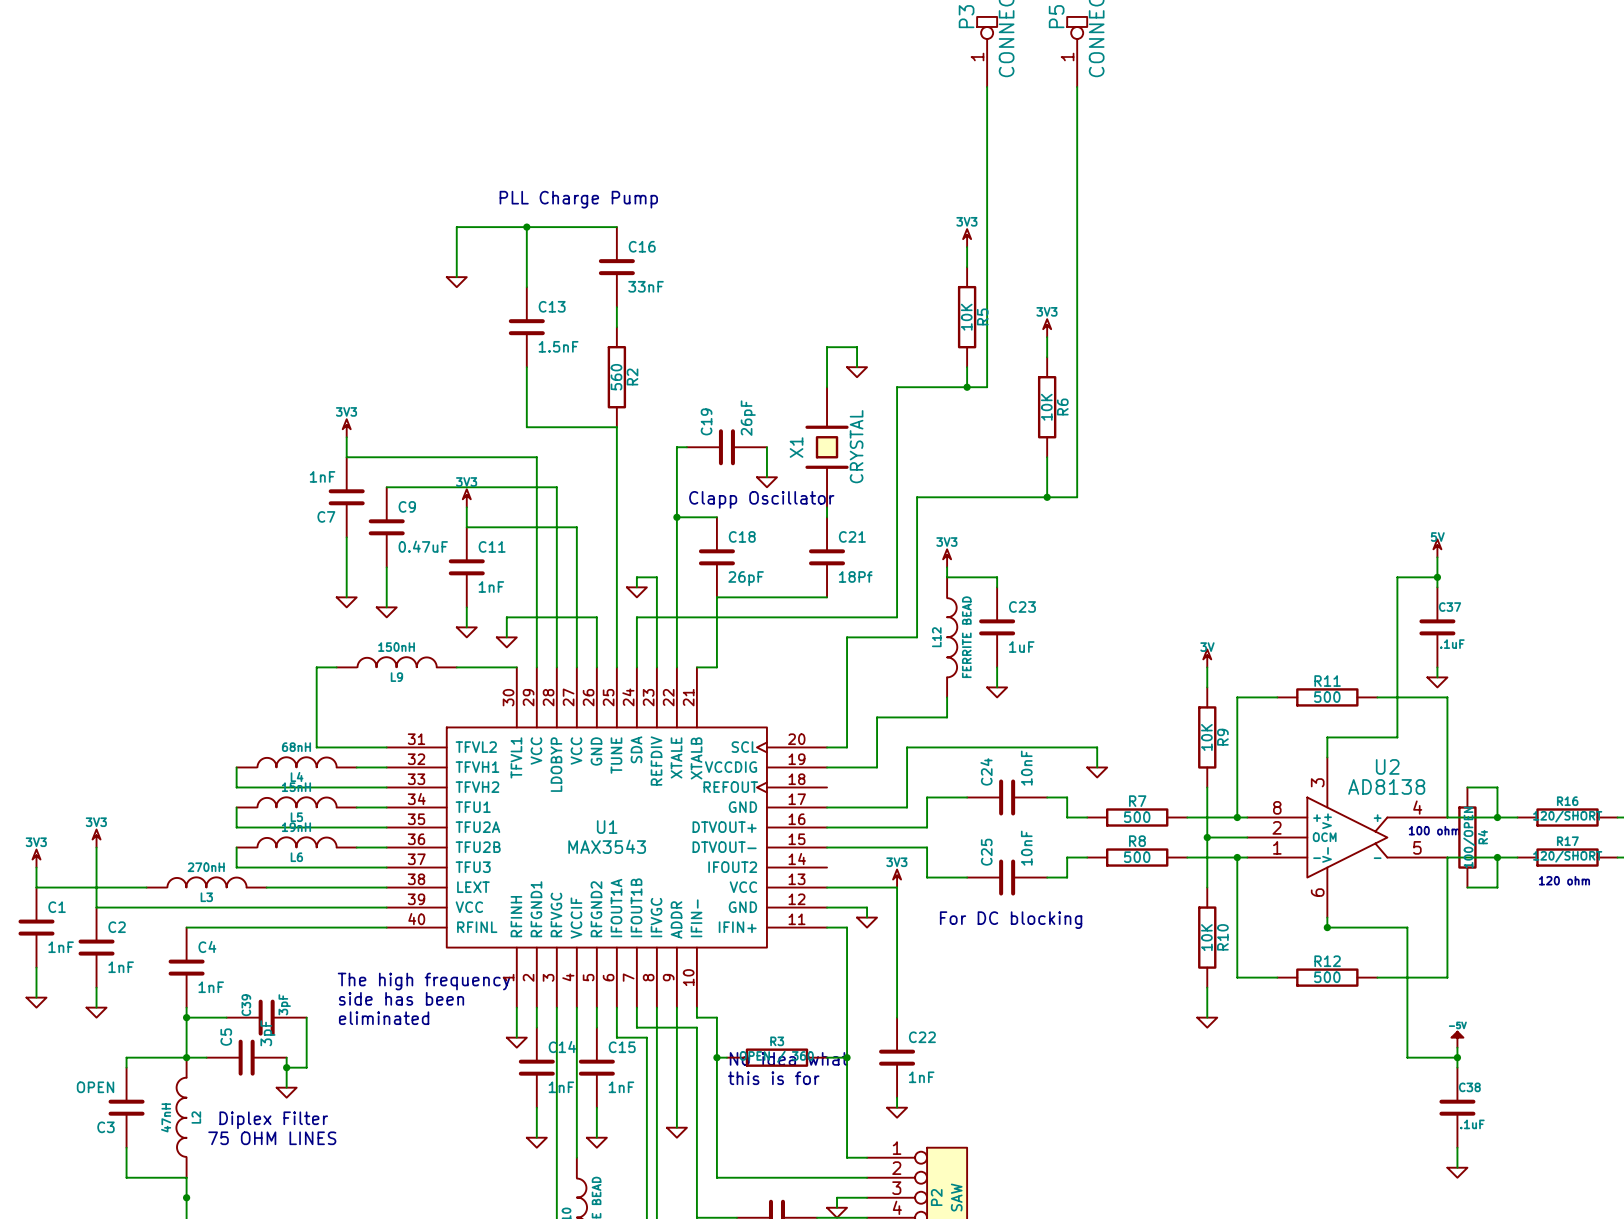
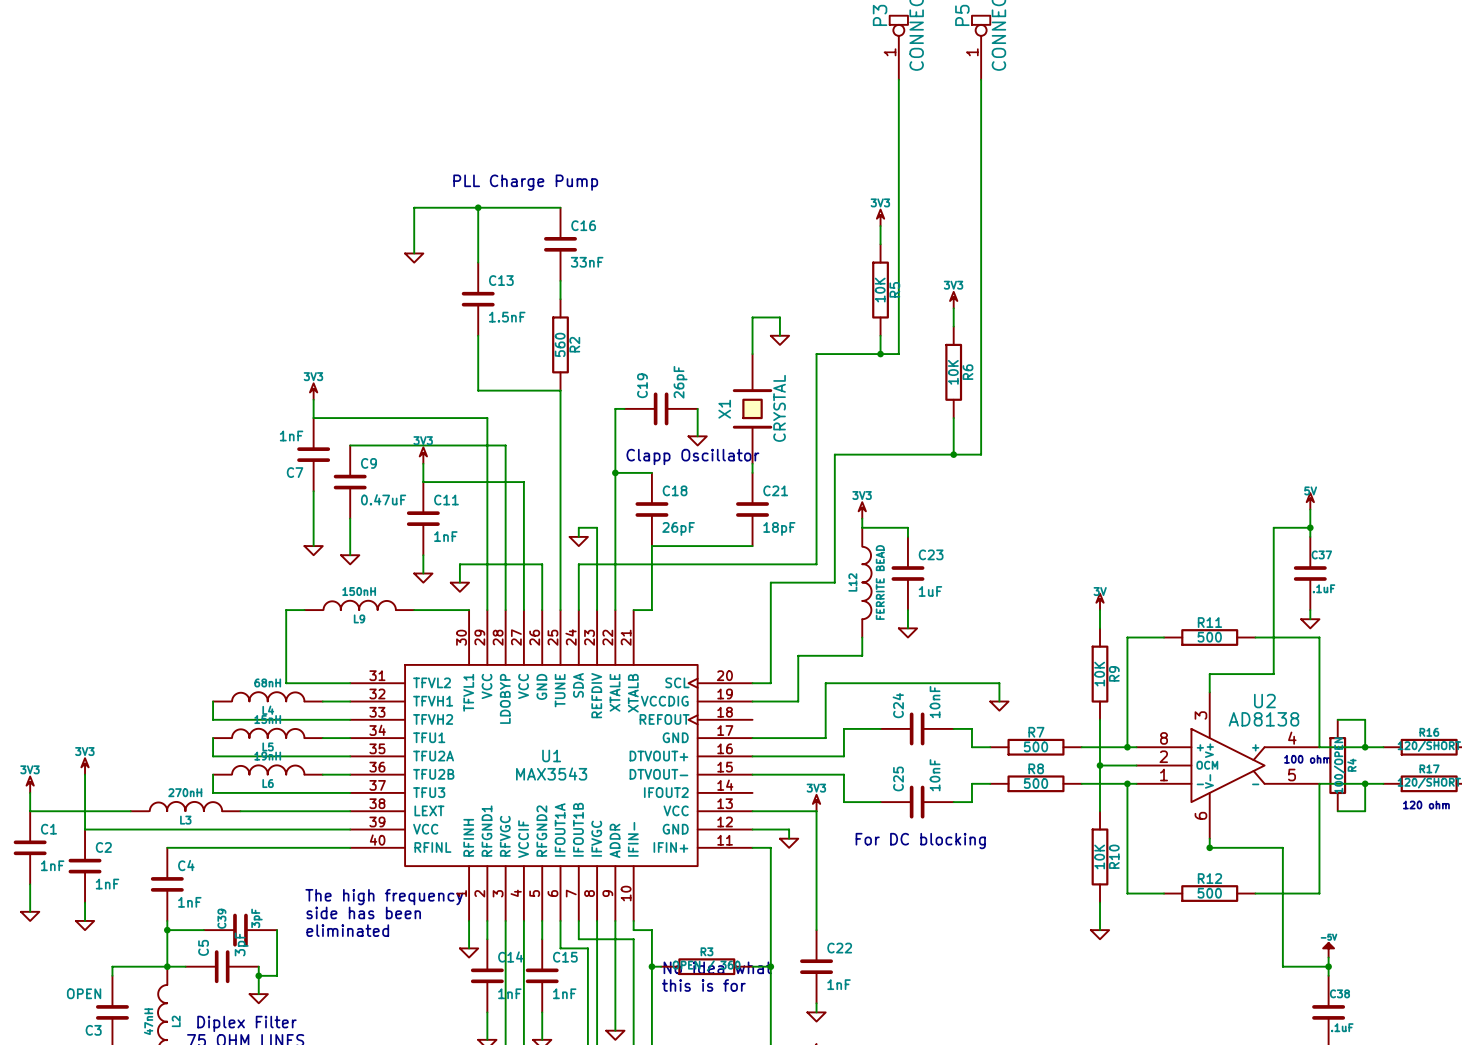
C21 value: 18Pf (855, 576) -> 18pF (779, 528)

